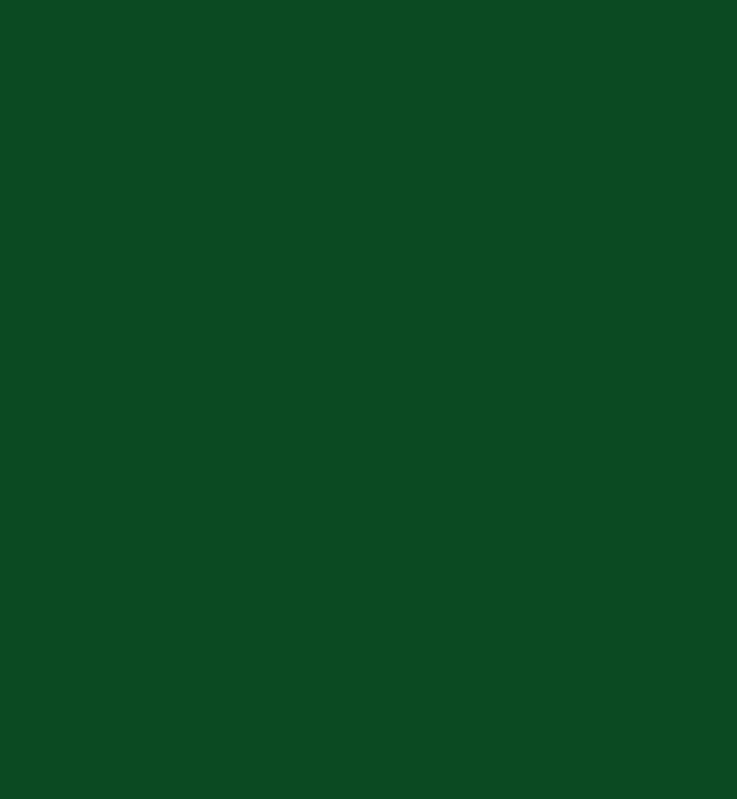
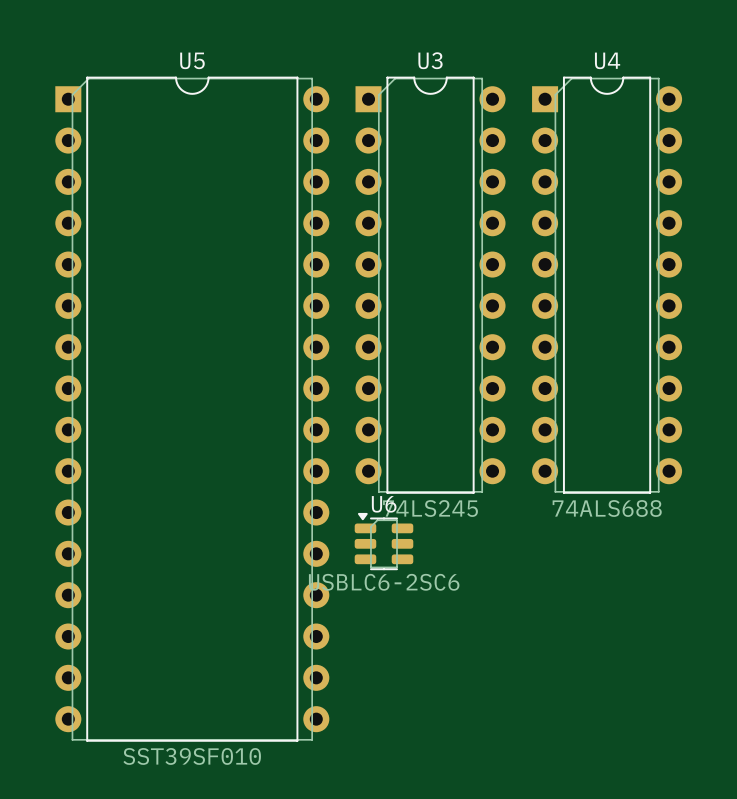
U3: none -> 74LS245 (430, 285)
U4: none -> 74ALS688 (607, 285)
U5: none -> SST39SF010 (192, 409)
U6: none -> USBLC6-2SC6 (383, 541)

